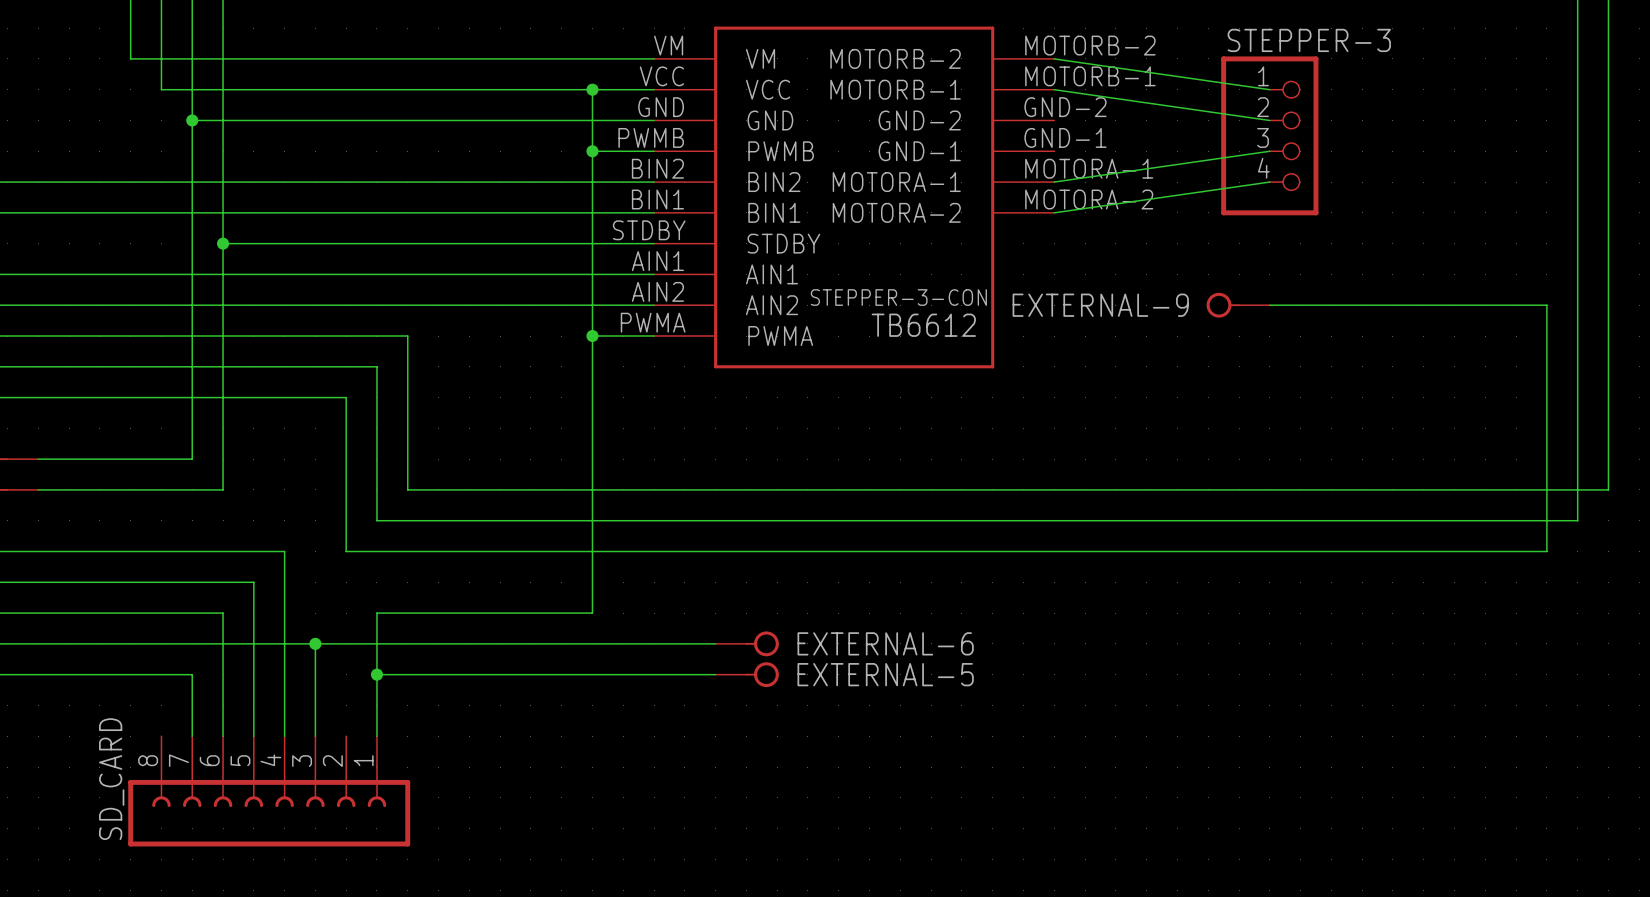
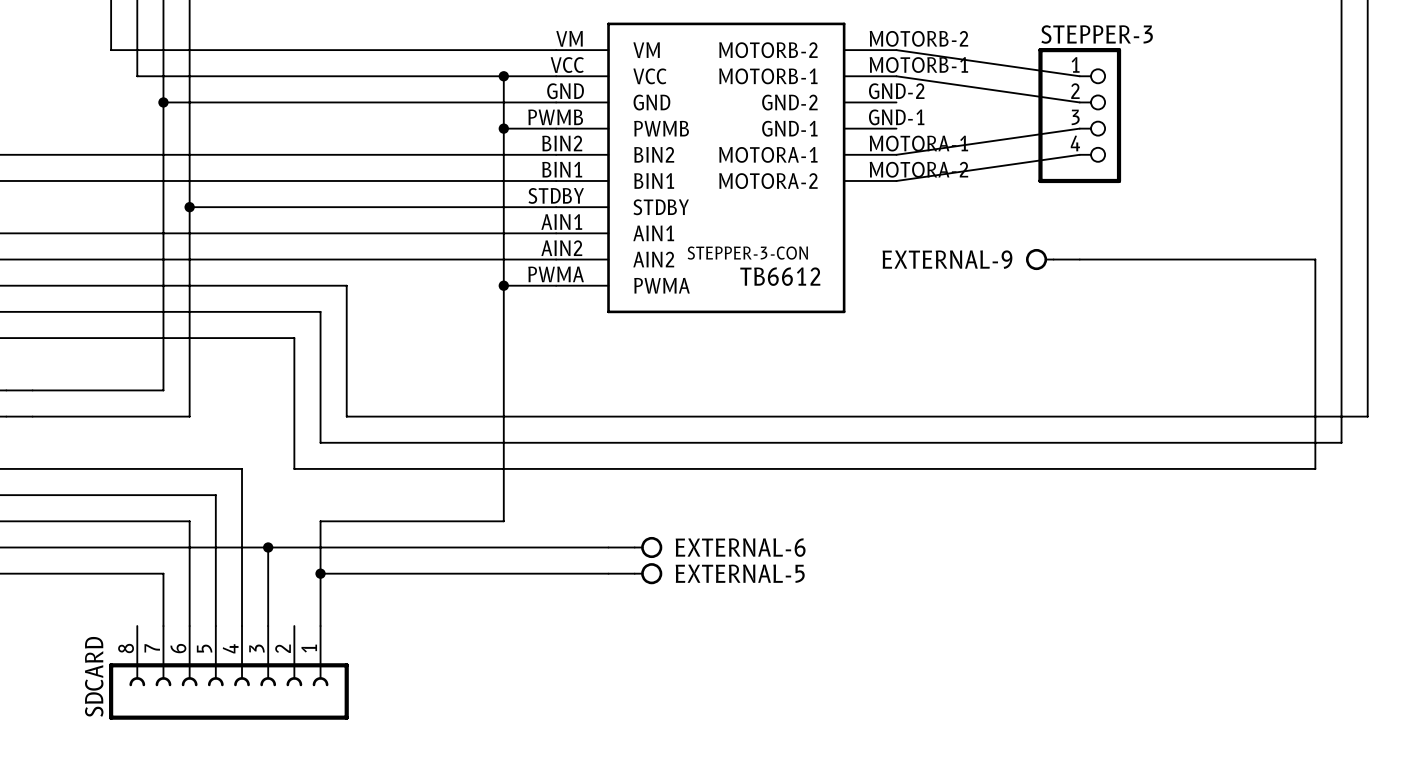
SD_CARD name: SD_CARD (111, 779) -> SDCARD (94, 676)

